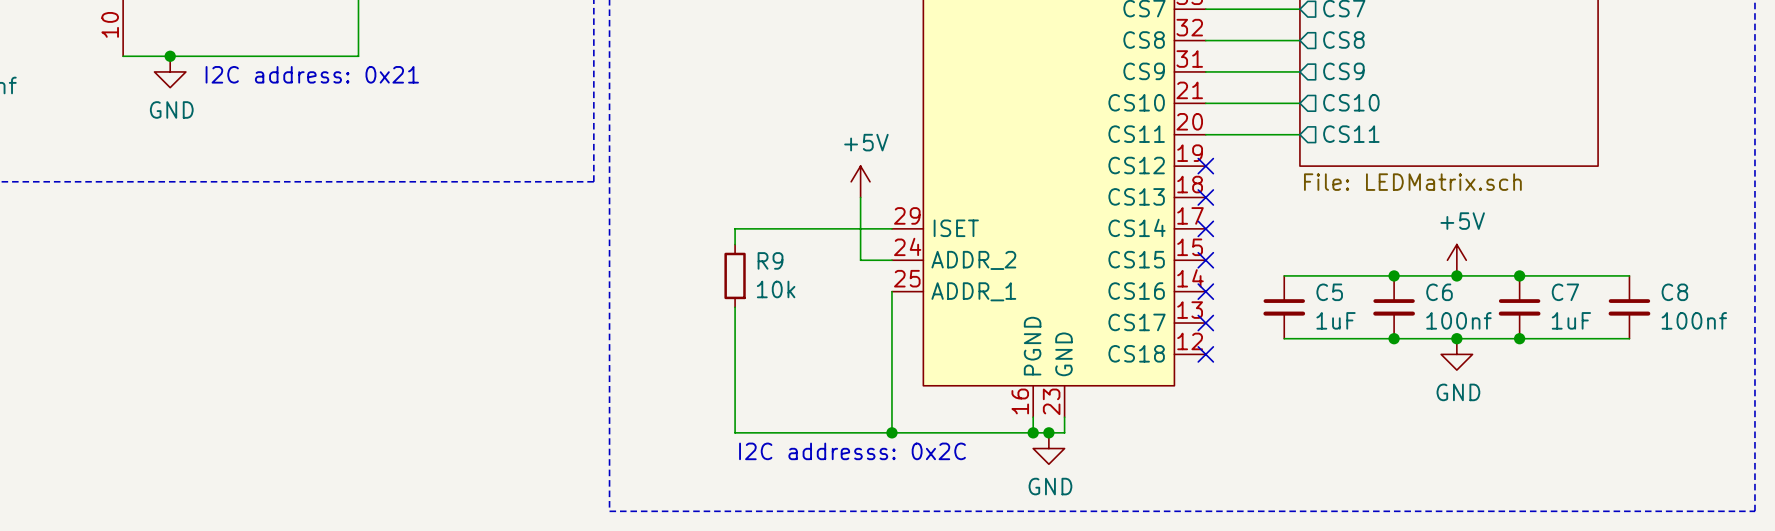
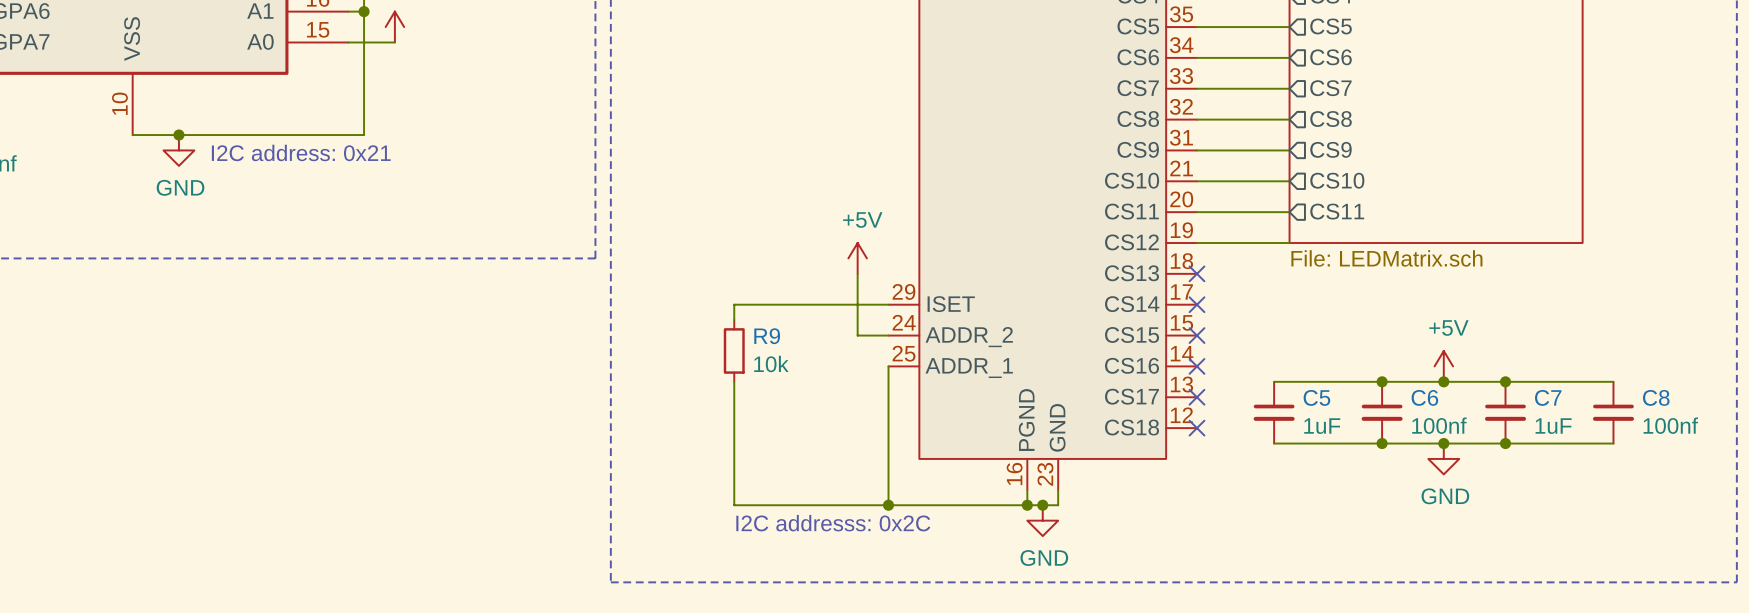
wire: none -> (1197, 243) (1289, 243)
no-connect mark: (1205, 166) -> none
power symbol position: +5V (1456, 260) -> +5V (1443, 366)
wire: (1284, 275) (1629, 275) -> (1274, 381) (1613, 381)
junction: (1394, 275) -> none
junction: (1456, 275) -> none
junction: (1519, 275) -> none
C5 position: (1284, 307) -> (1274, 412)
C6 position: (1394, 307) -> (1382, 412)
junction: none -> (1382, 381)
junction: none -> (1443, 381)
C7 position: (1519, 307) -> (1505, 412)
junction: none -> (1505, 381)
C8 position: (1629, 307) -> (1613, 412)
wire: (1284, 338) (1629, 338) -> (1274, 443) (1613, 443)
junction: (1394, 338) -> none
junction: (1456, 338) -> none
junction: (1519, 338) -> none
power symbol position: GND (1456, 354) -> GND (1443, 458)
junction: none -> (1382, 443)
junction: none -> (1443, 443)
junction: none -> (1505, 443)

